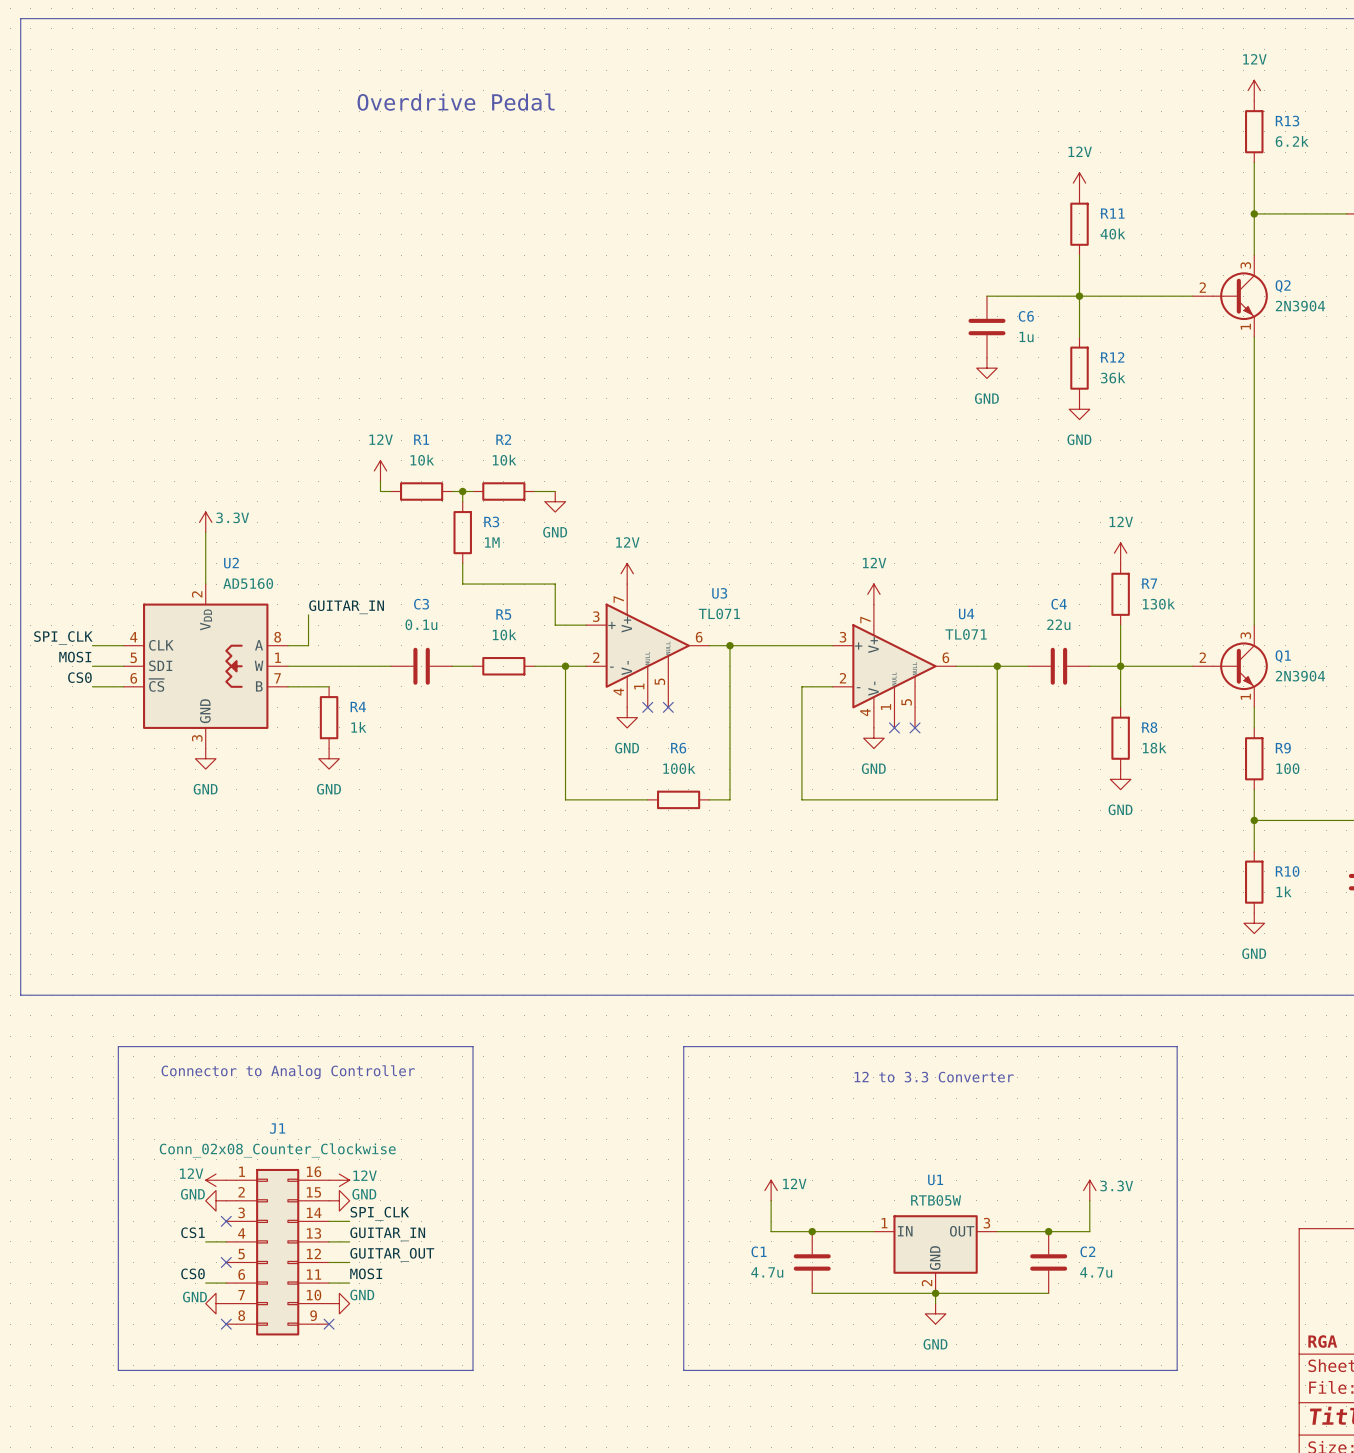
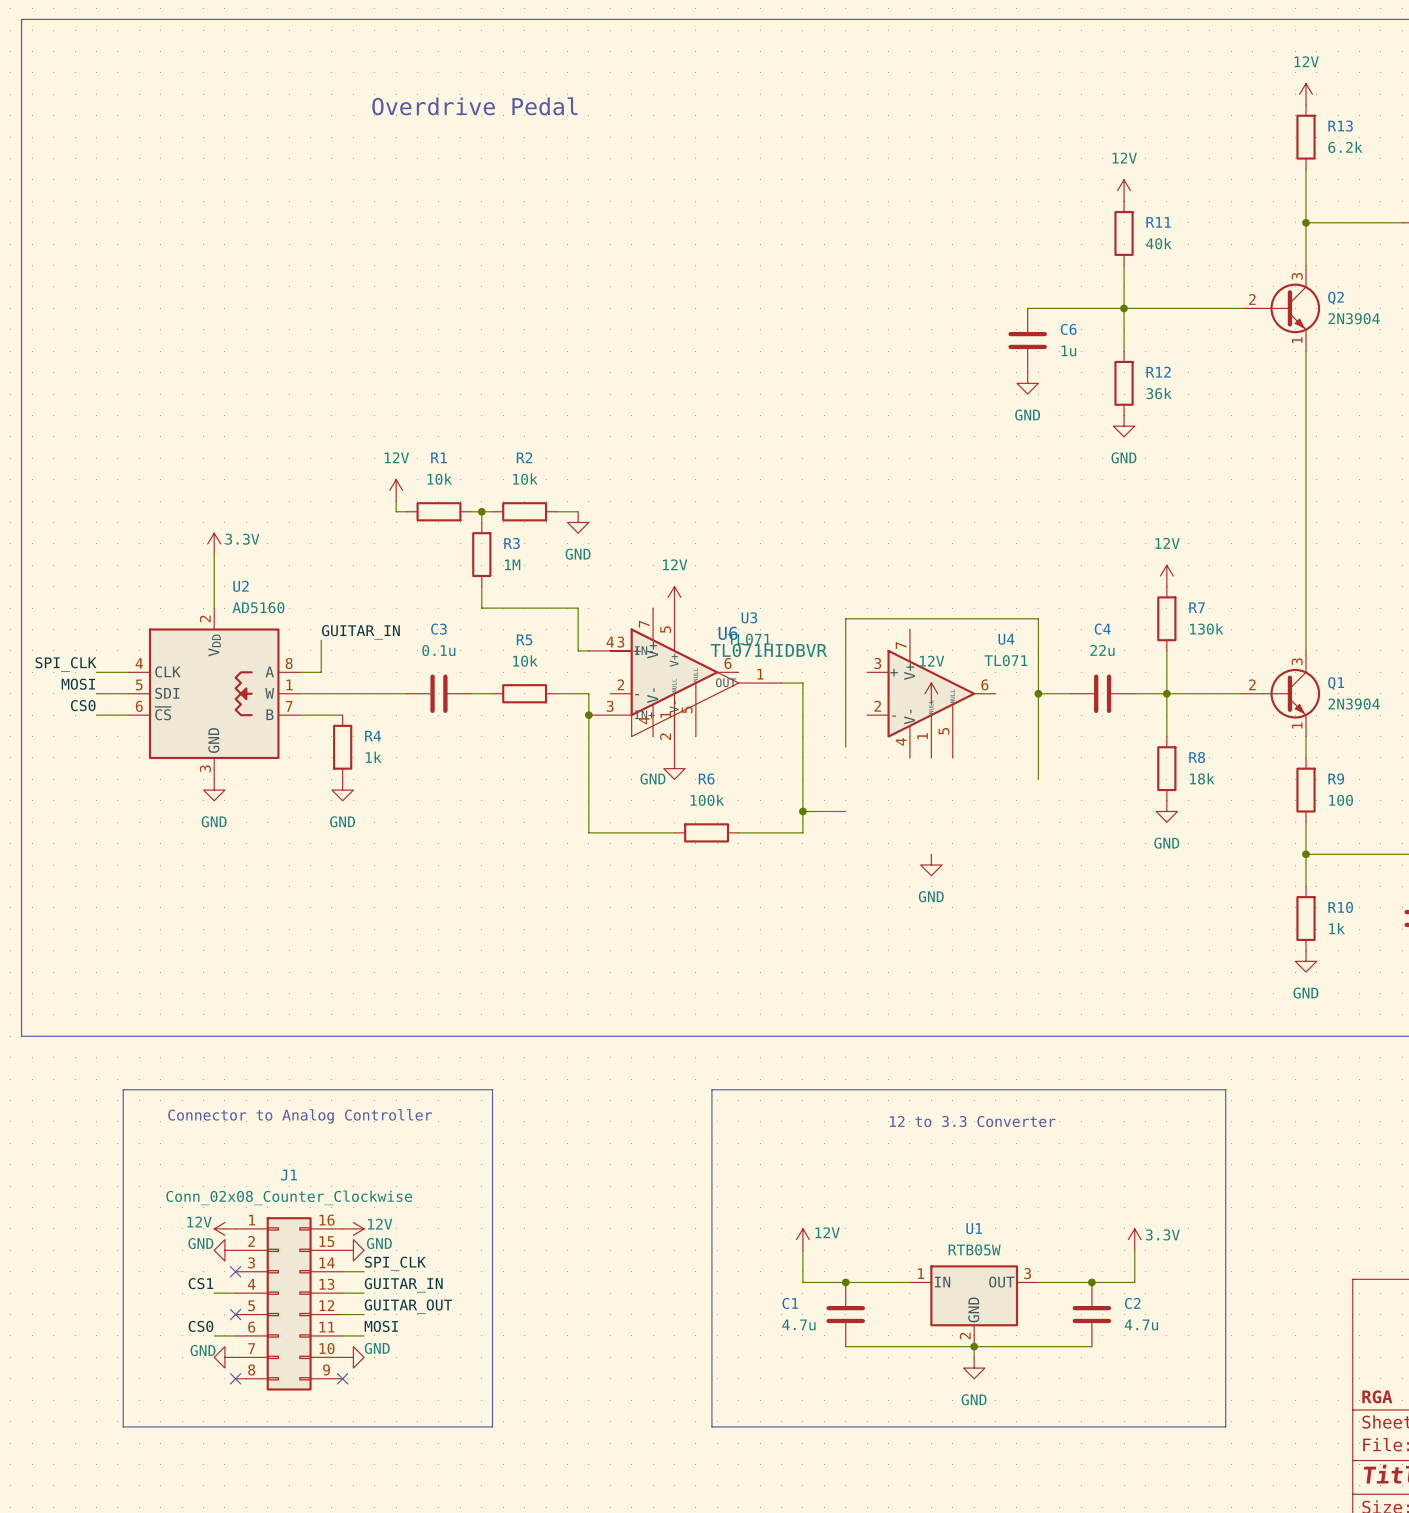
power symbol position: 12V (627, 573) -> 12V (674, 597)
power symbol position: 12V (873, 594) -> 12V (931, 693)
wire: (709, 645) (832, 645) -> none
wire: (729, 645) (729, 799) -> (781, 683) (802, 683) (802, 832) (760, 832)
junction: (729, 645) -> none
U6: none -> TL071HIDBVR (685, 683)
wire: (565, 666) (586, 666) -> none
junction position: (565, 666) -> (588, 715)
wire: (956, 666) (997, 666) -> (845, 747) (845, 618) (1038, 618) (1038, 693)
wire: (832, 686) (801, 686) (801, 799) (997, 799) (997, 748) -> none
no-connect mark: (647, 707) -> none
no-connect mark: (668, 707) -> none
power symbol position: GND (627, 717) -> GND (674, 768)
no-connect mark: (894, 727) -> none
no-connect mark: (915, 727) -> none
power symbol position: GND (873, 738) -> GND (931, 865)
wire: none -> (802, 811) (845, 811)
junction: none -> (802, 811)

